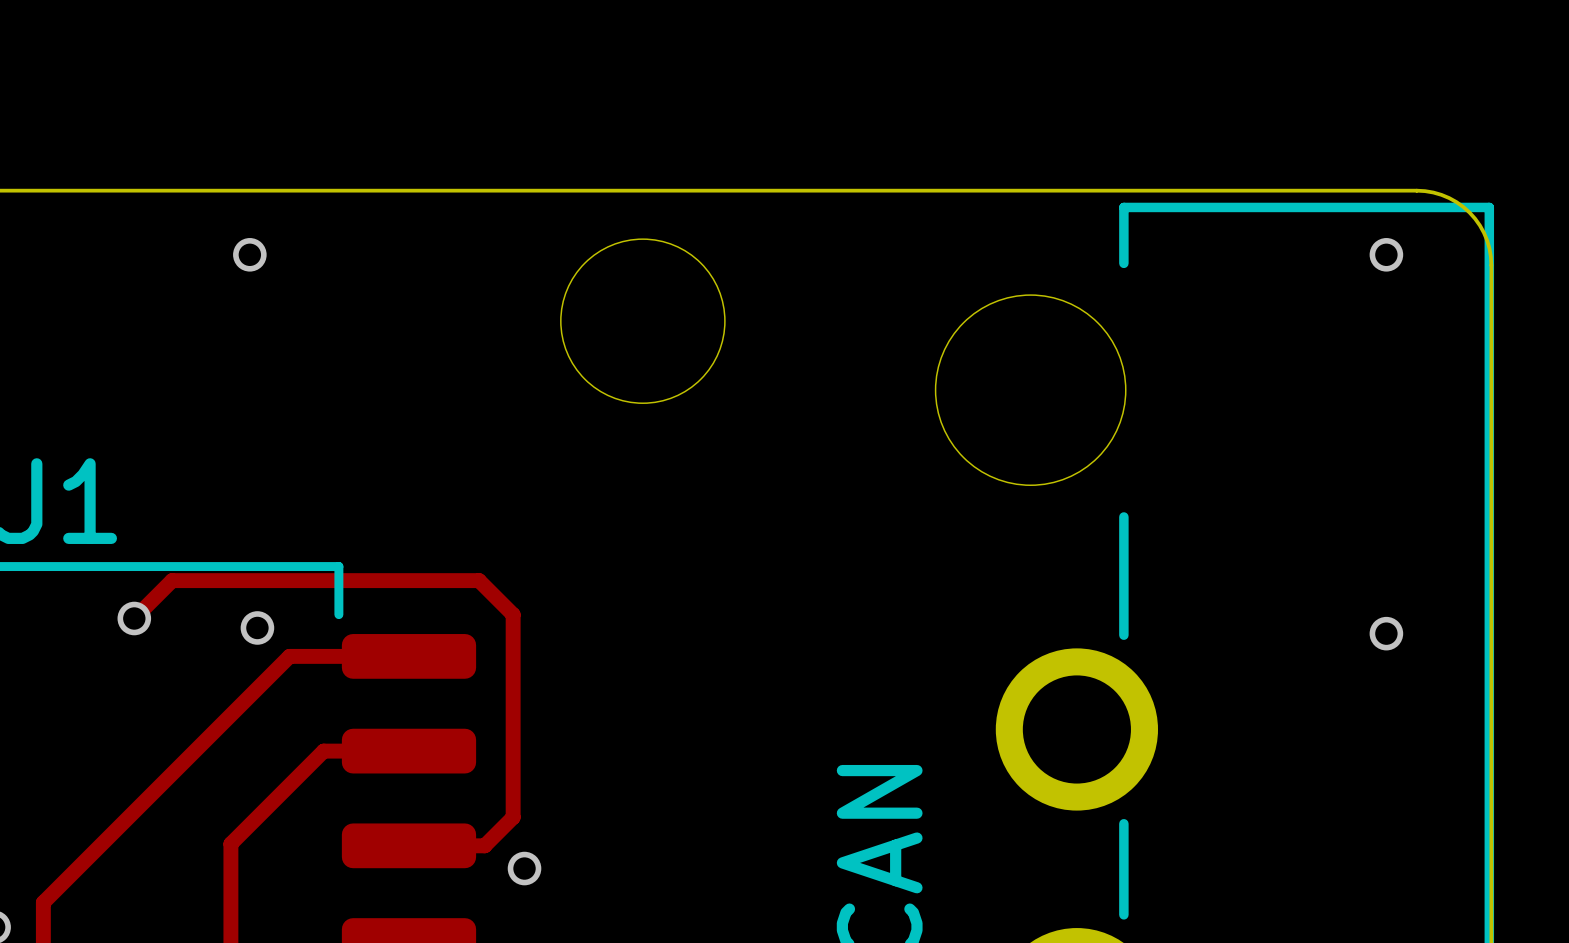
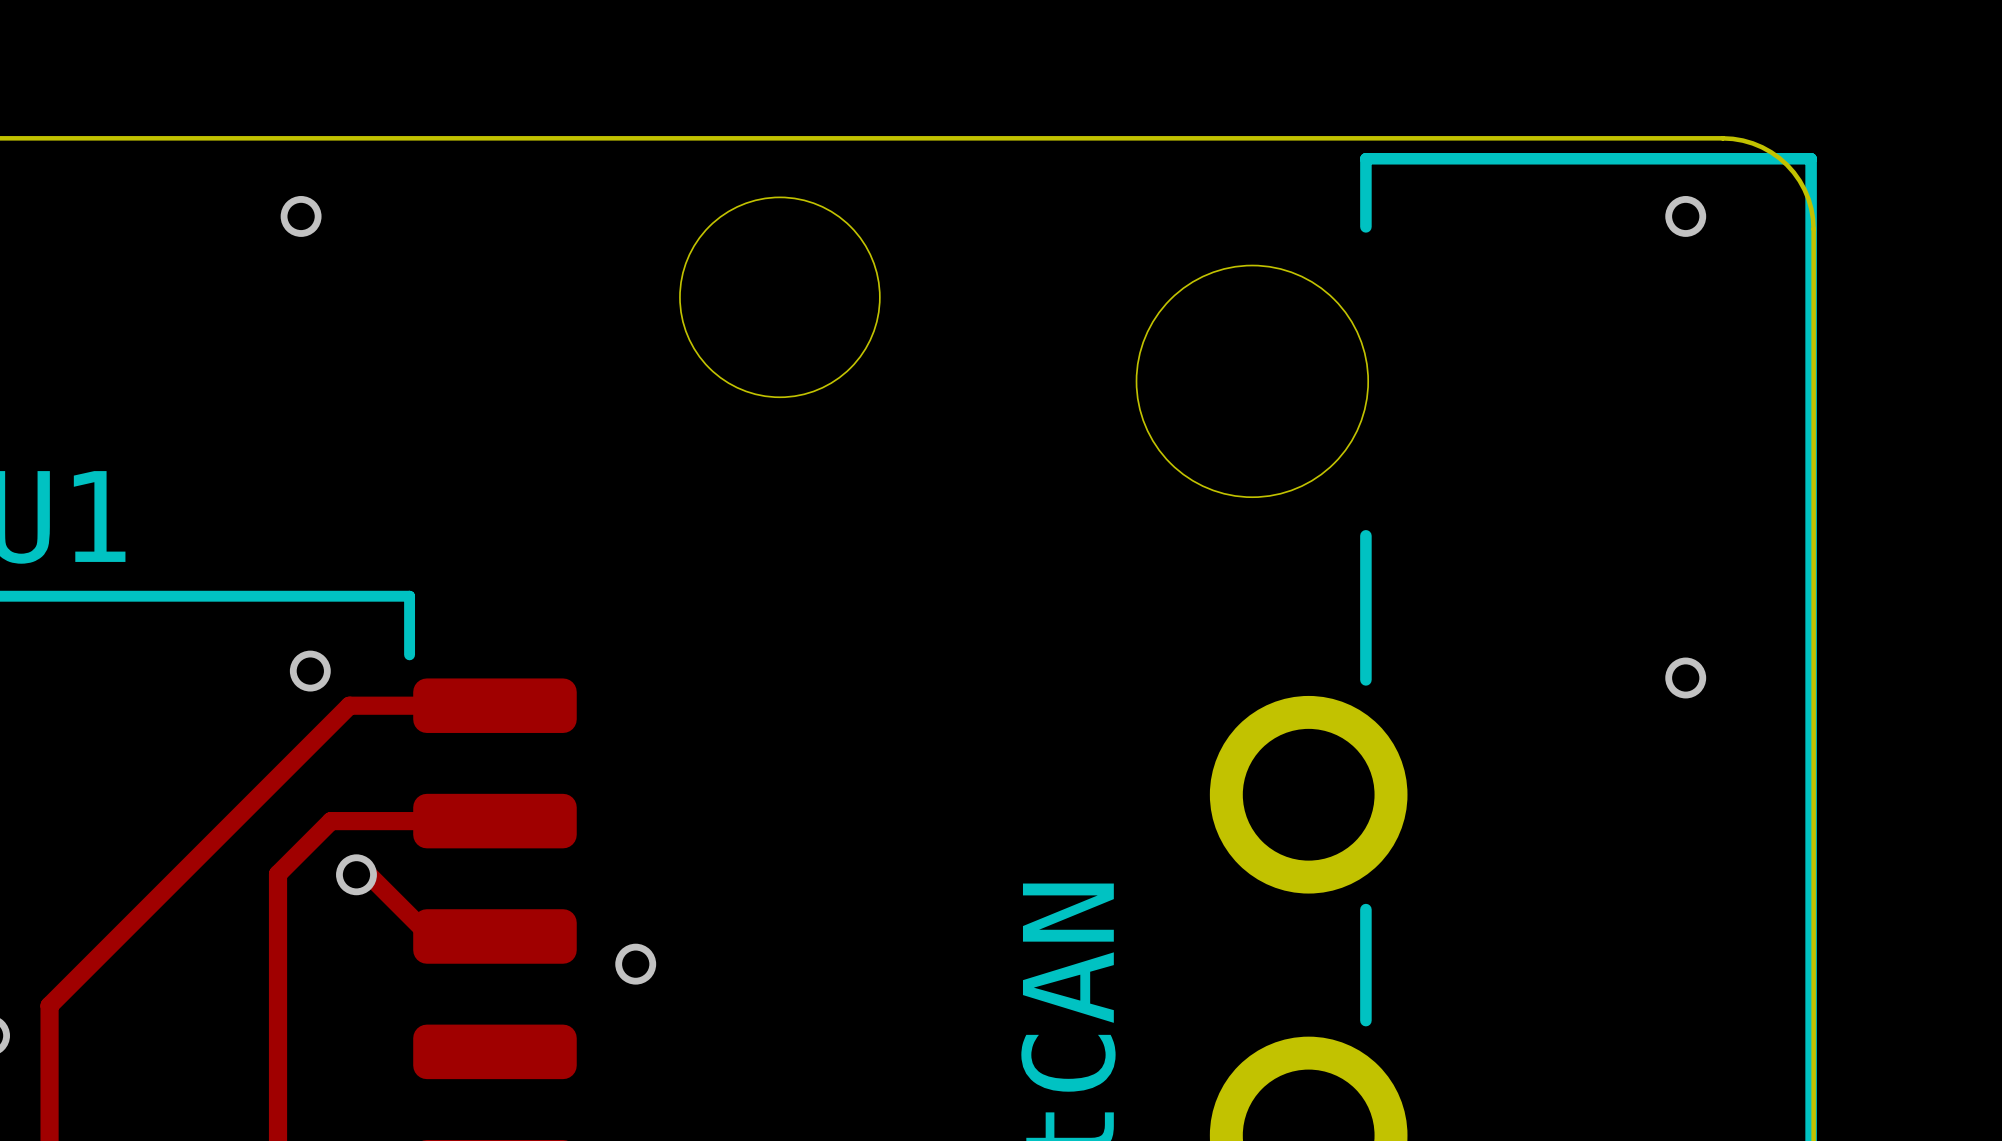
track: (134, 618) (172, 580) (479, 580) (513, 614) (513, 817) (484, 845) (408, 845) -> none
via position: (134, 618) -> (356, 874)
track: (323, 751) (230, 843) -> (391, 821) (331, 821) (278, 874) (278, 934)
track: none -> (356, 874) (368, 874) (430, 936)

